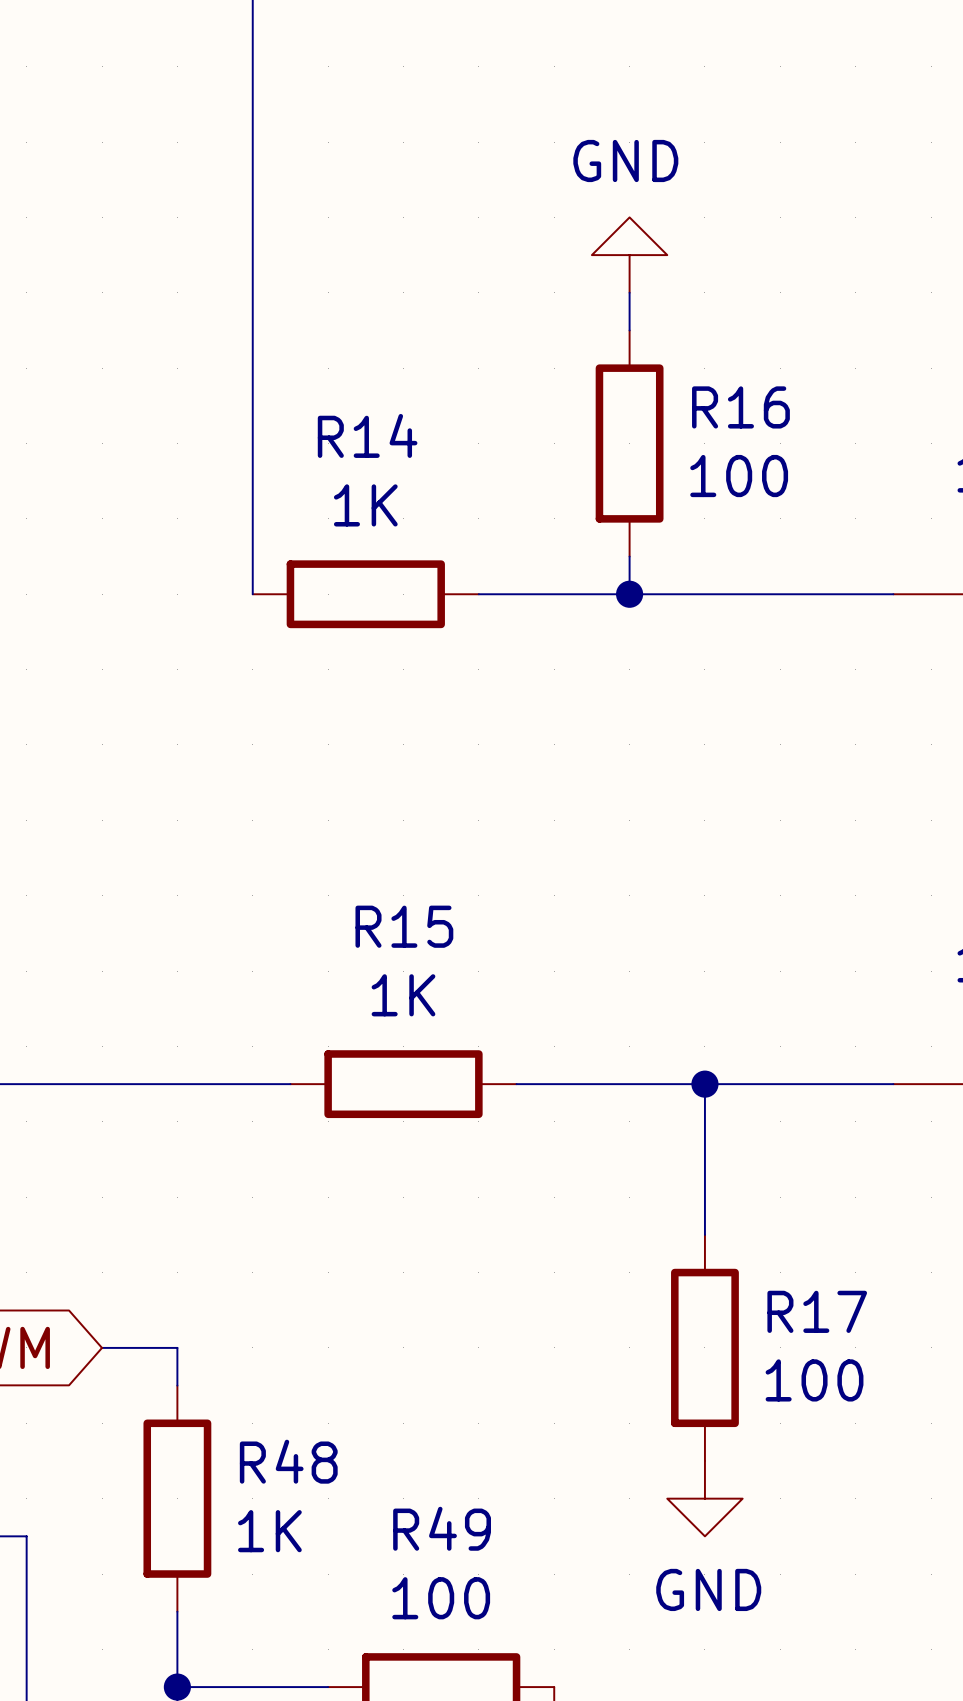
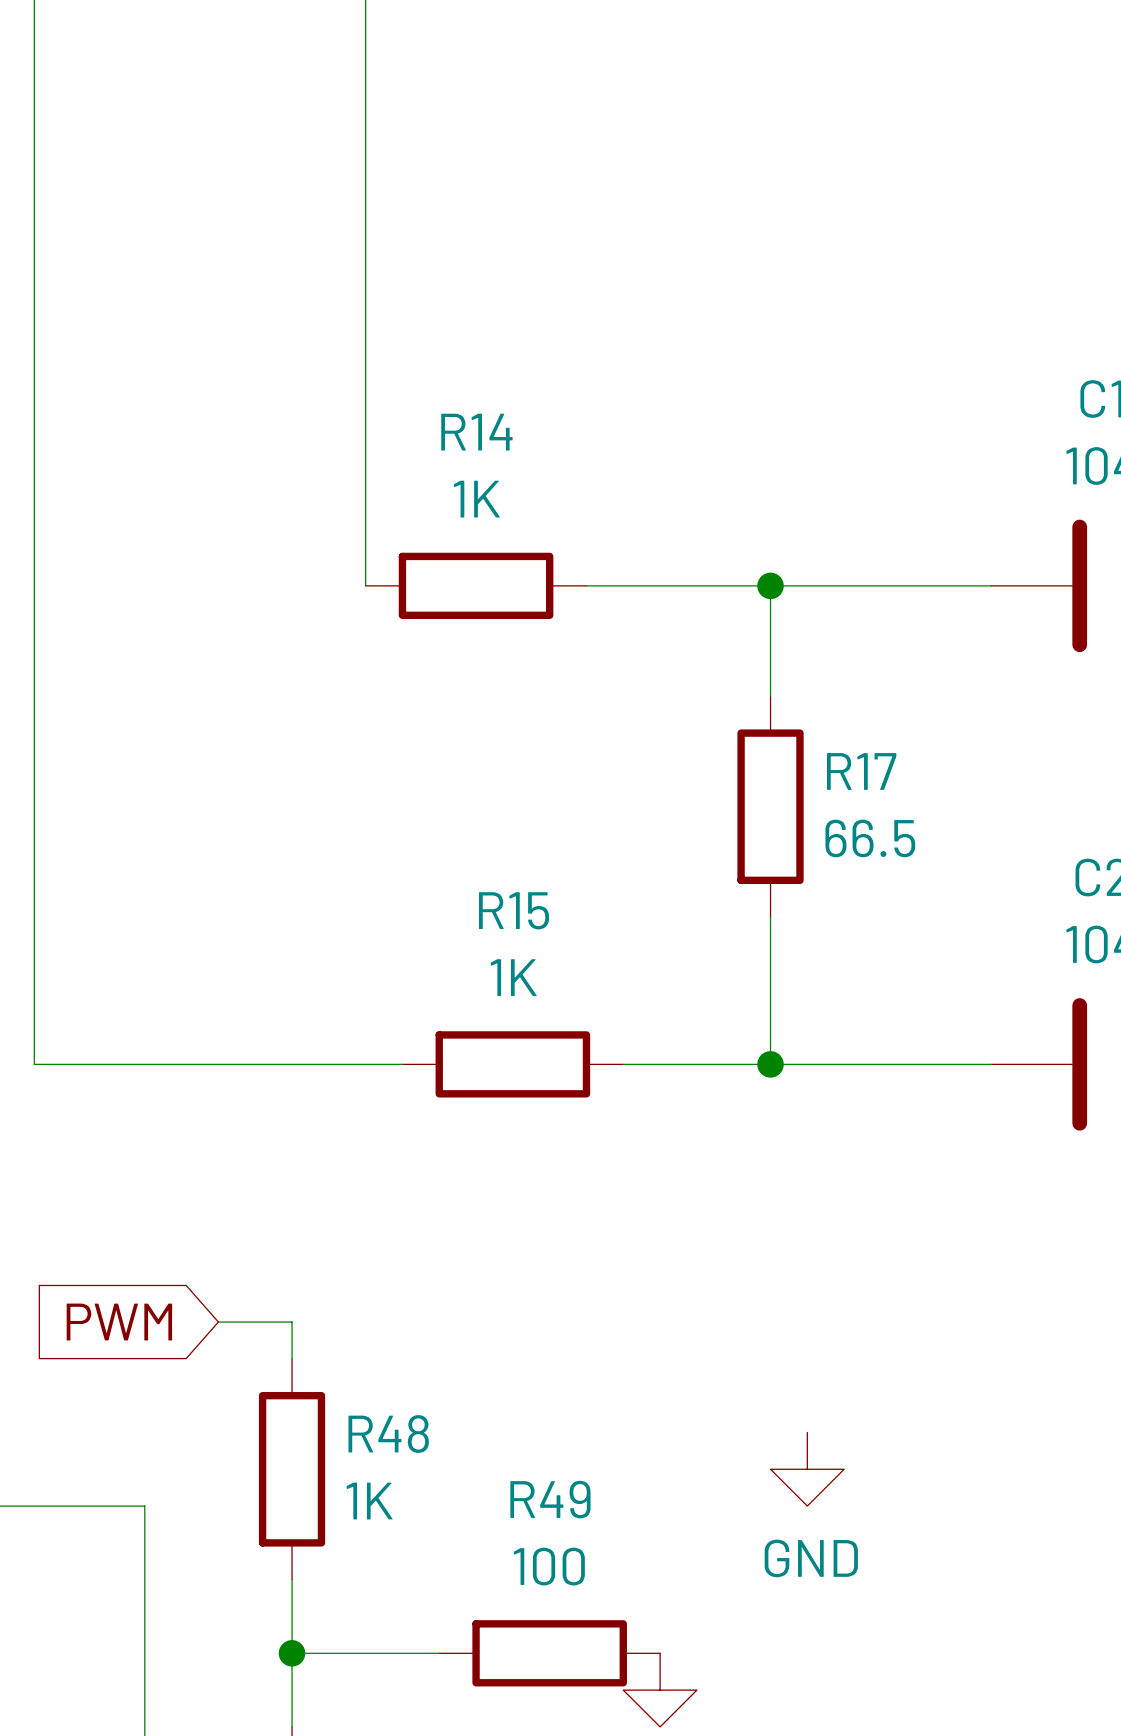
power symbol: GND (629, 255) -> none
wire: (629, 292) (629, 330) -> none
R16: 100 (629, 443) -> none
wire: (629, 556) (629, 594) -> none
junction position: (629, 594) -> (770, 585)
wire: none -> (770, 585) (770, 696)
wire: (704, 1084) (704, 1234) -> (770, 917) (770, 1064)
junction position: (704, 1084) -> (770, 1064)
R17 position: (704, 1347) -> (770, 806)
R17 value: 100 (814, 1380) -> 66.5 (870, 838)

